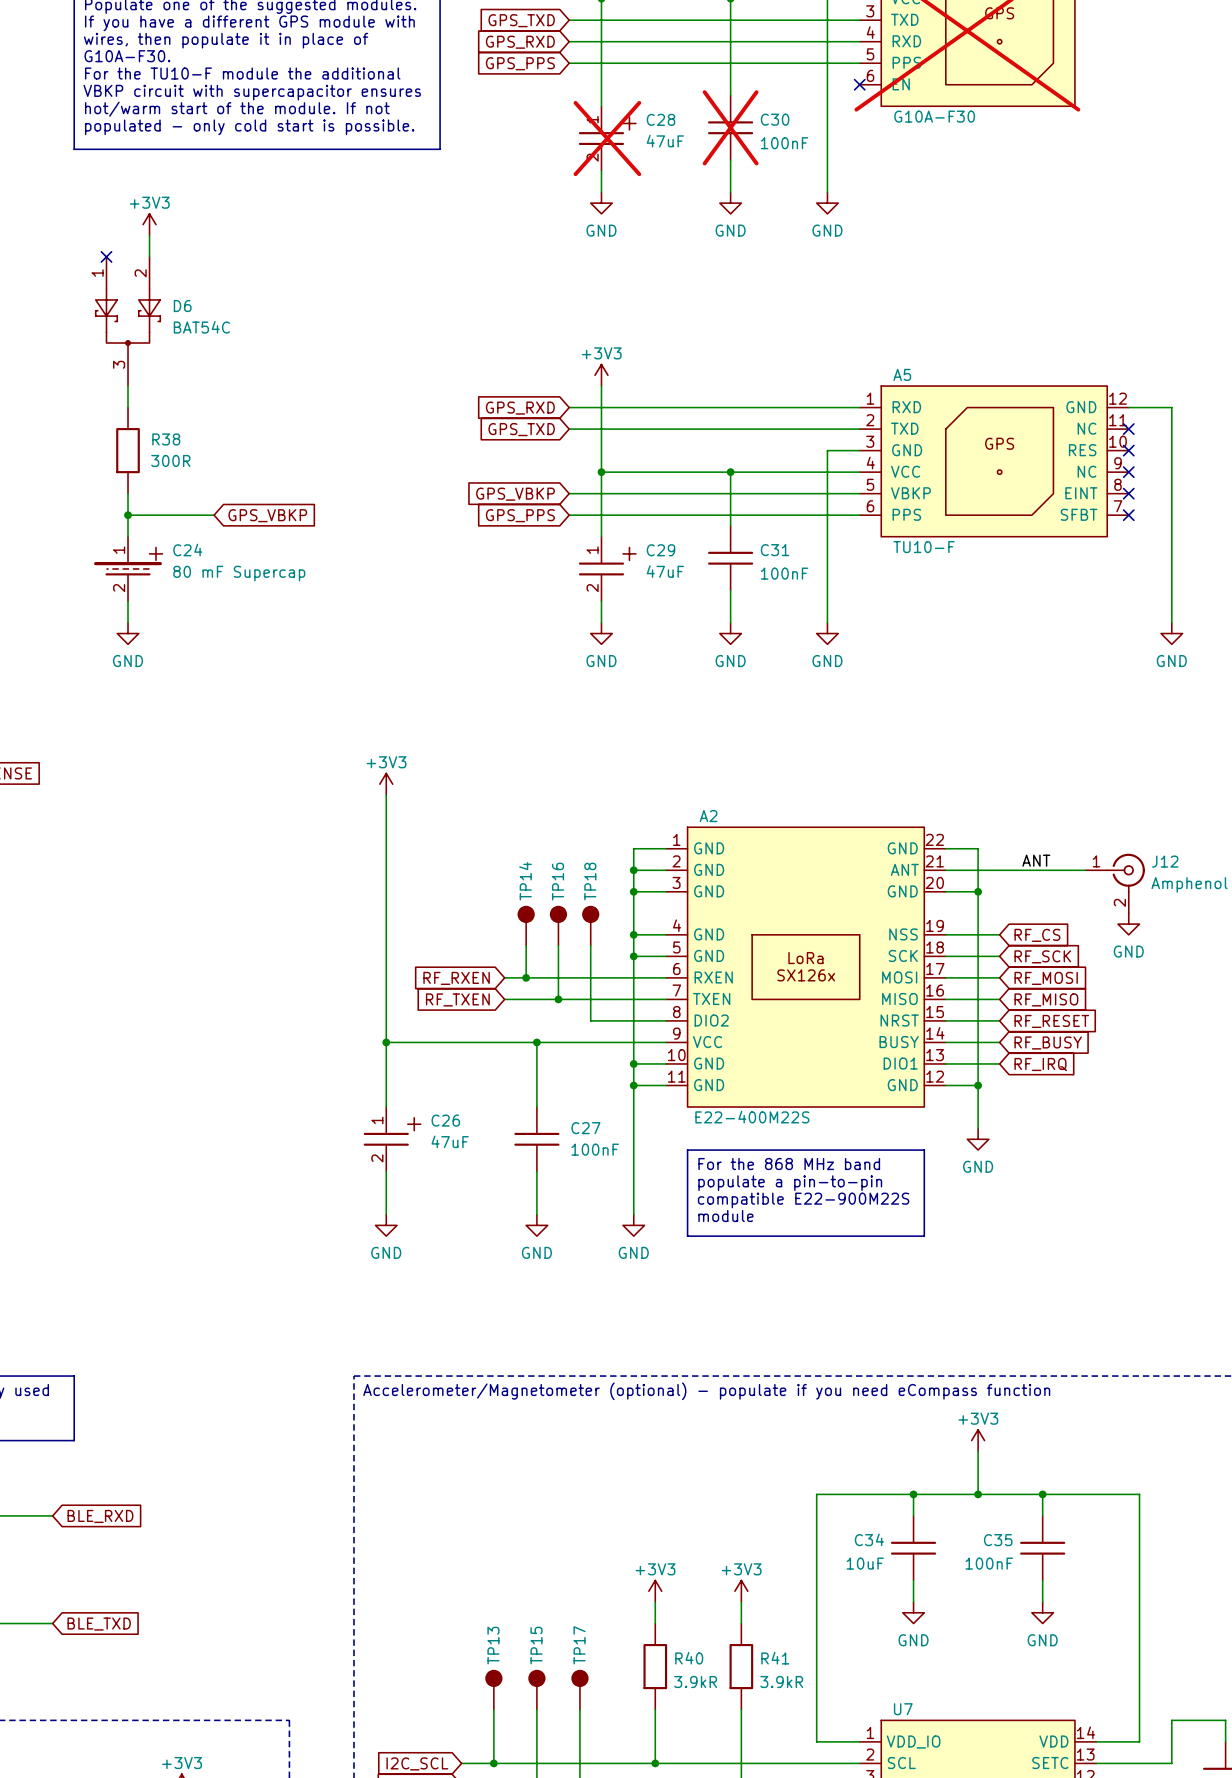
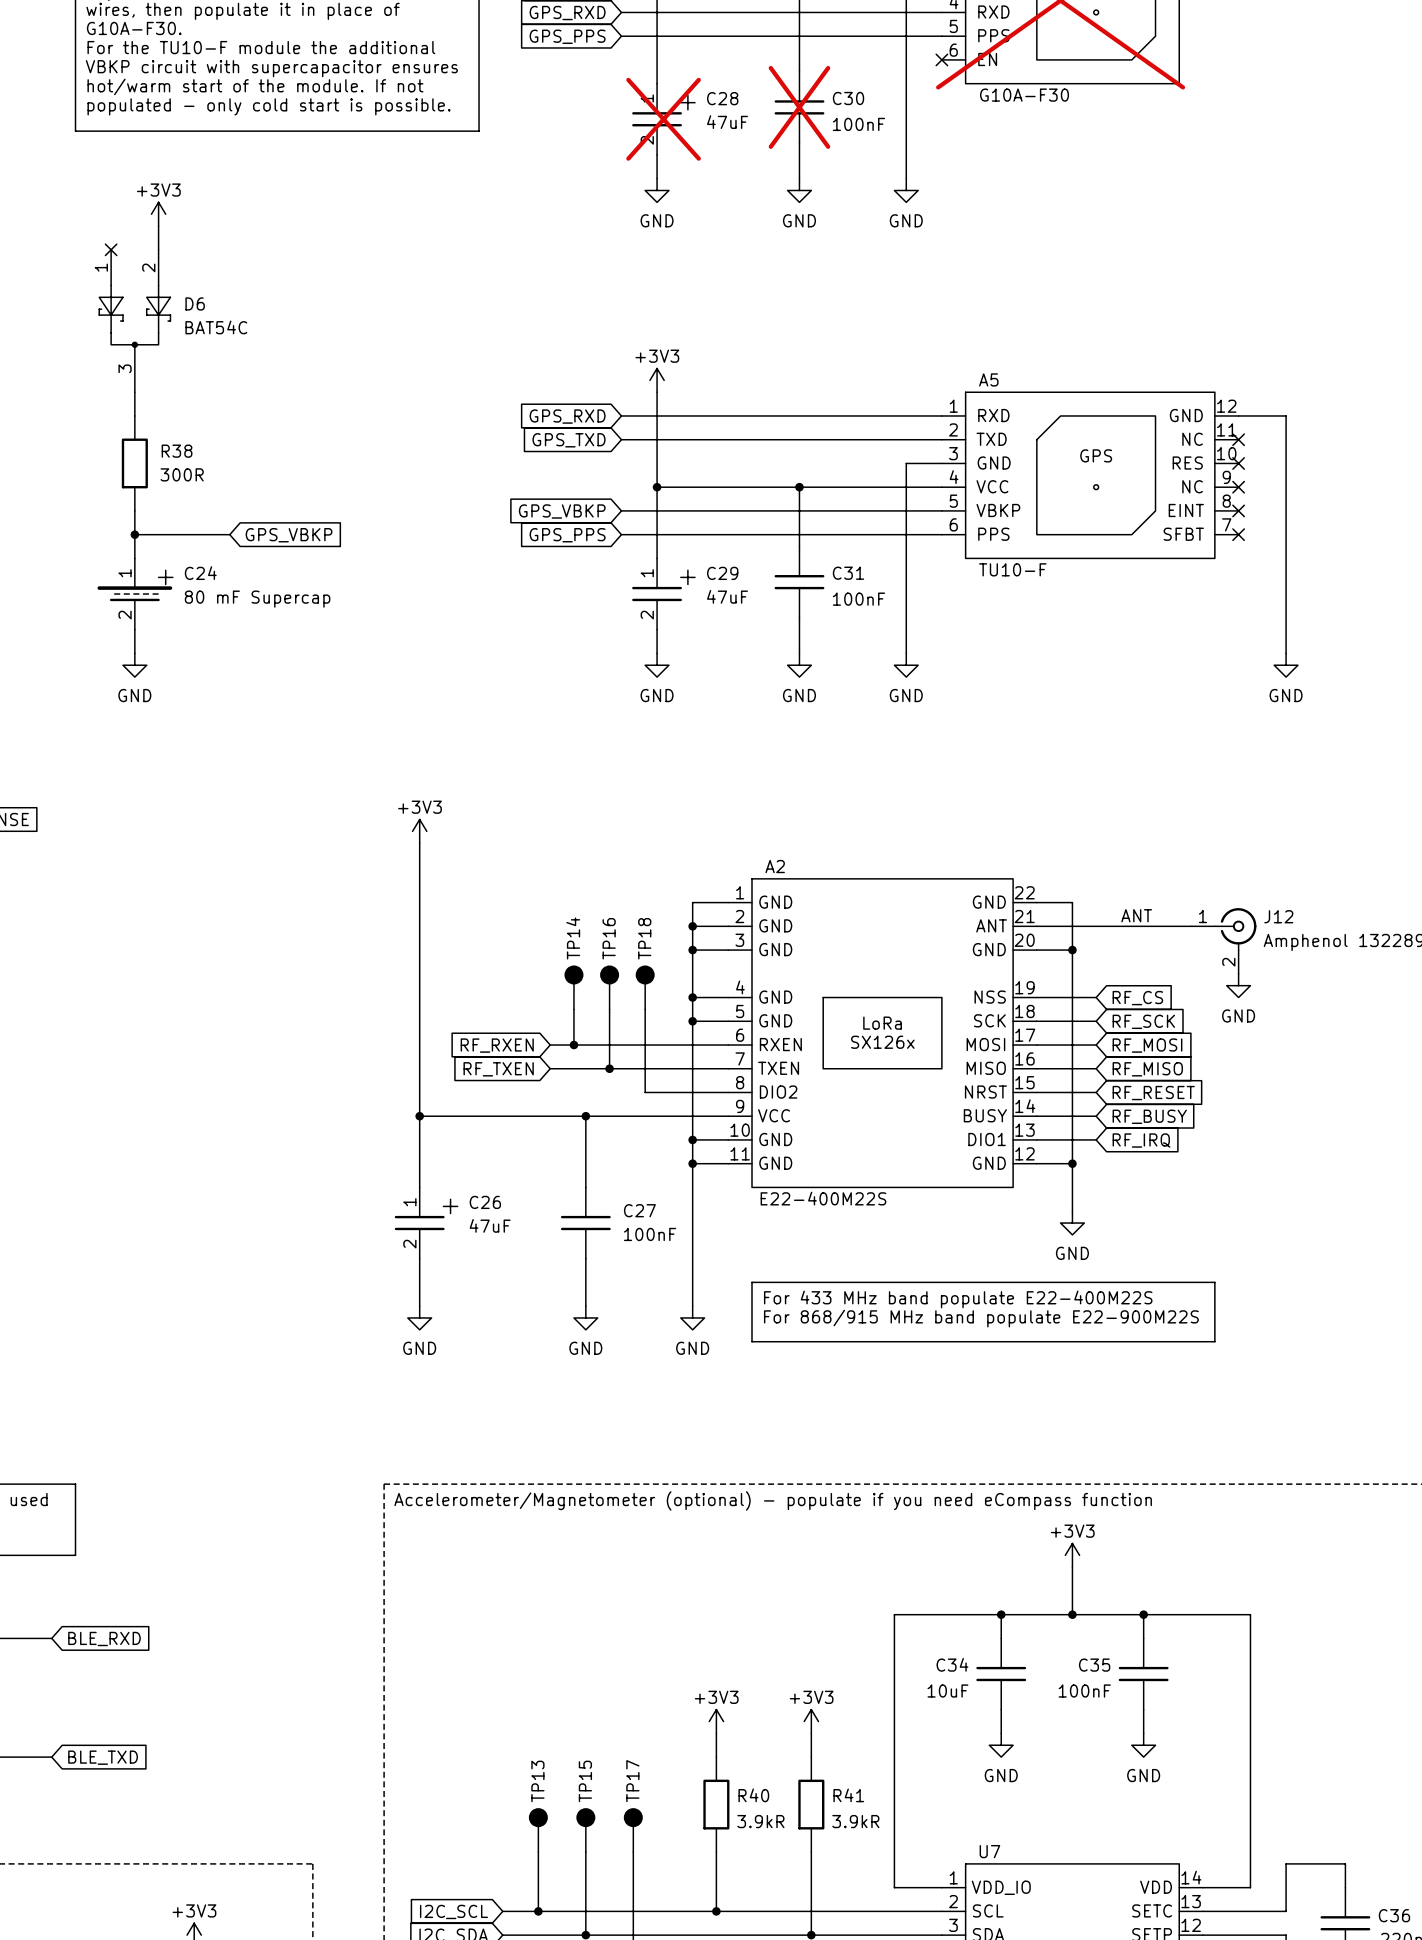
text: For the 868 MHz band (789, 1164) -> none
text: populate a pin-to-pin (790, 1183) -> none
line: (687, 1193) (687, 1150) (924, 1150) (924, 1236) (687, 1236) -> (752, 1282) (1214, 1282) (1214, 1341) (752, 1341) (752, 1329)
text: compatible E22-900M22S (803, 1200) -> none
text: none -> For 433 MHz band populate E22-400M22S (958, 1299)
text: module (725, 1216) -> none
text: none -> For 868/915 MHz band populate E22-900M22S (981, 1318)

